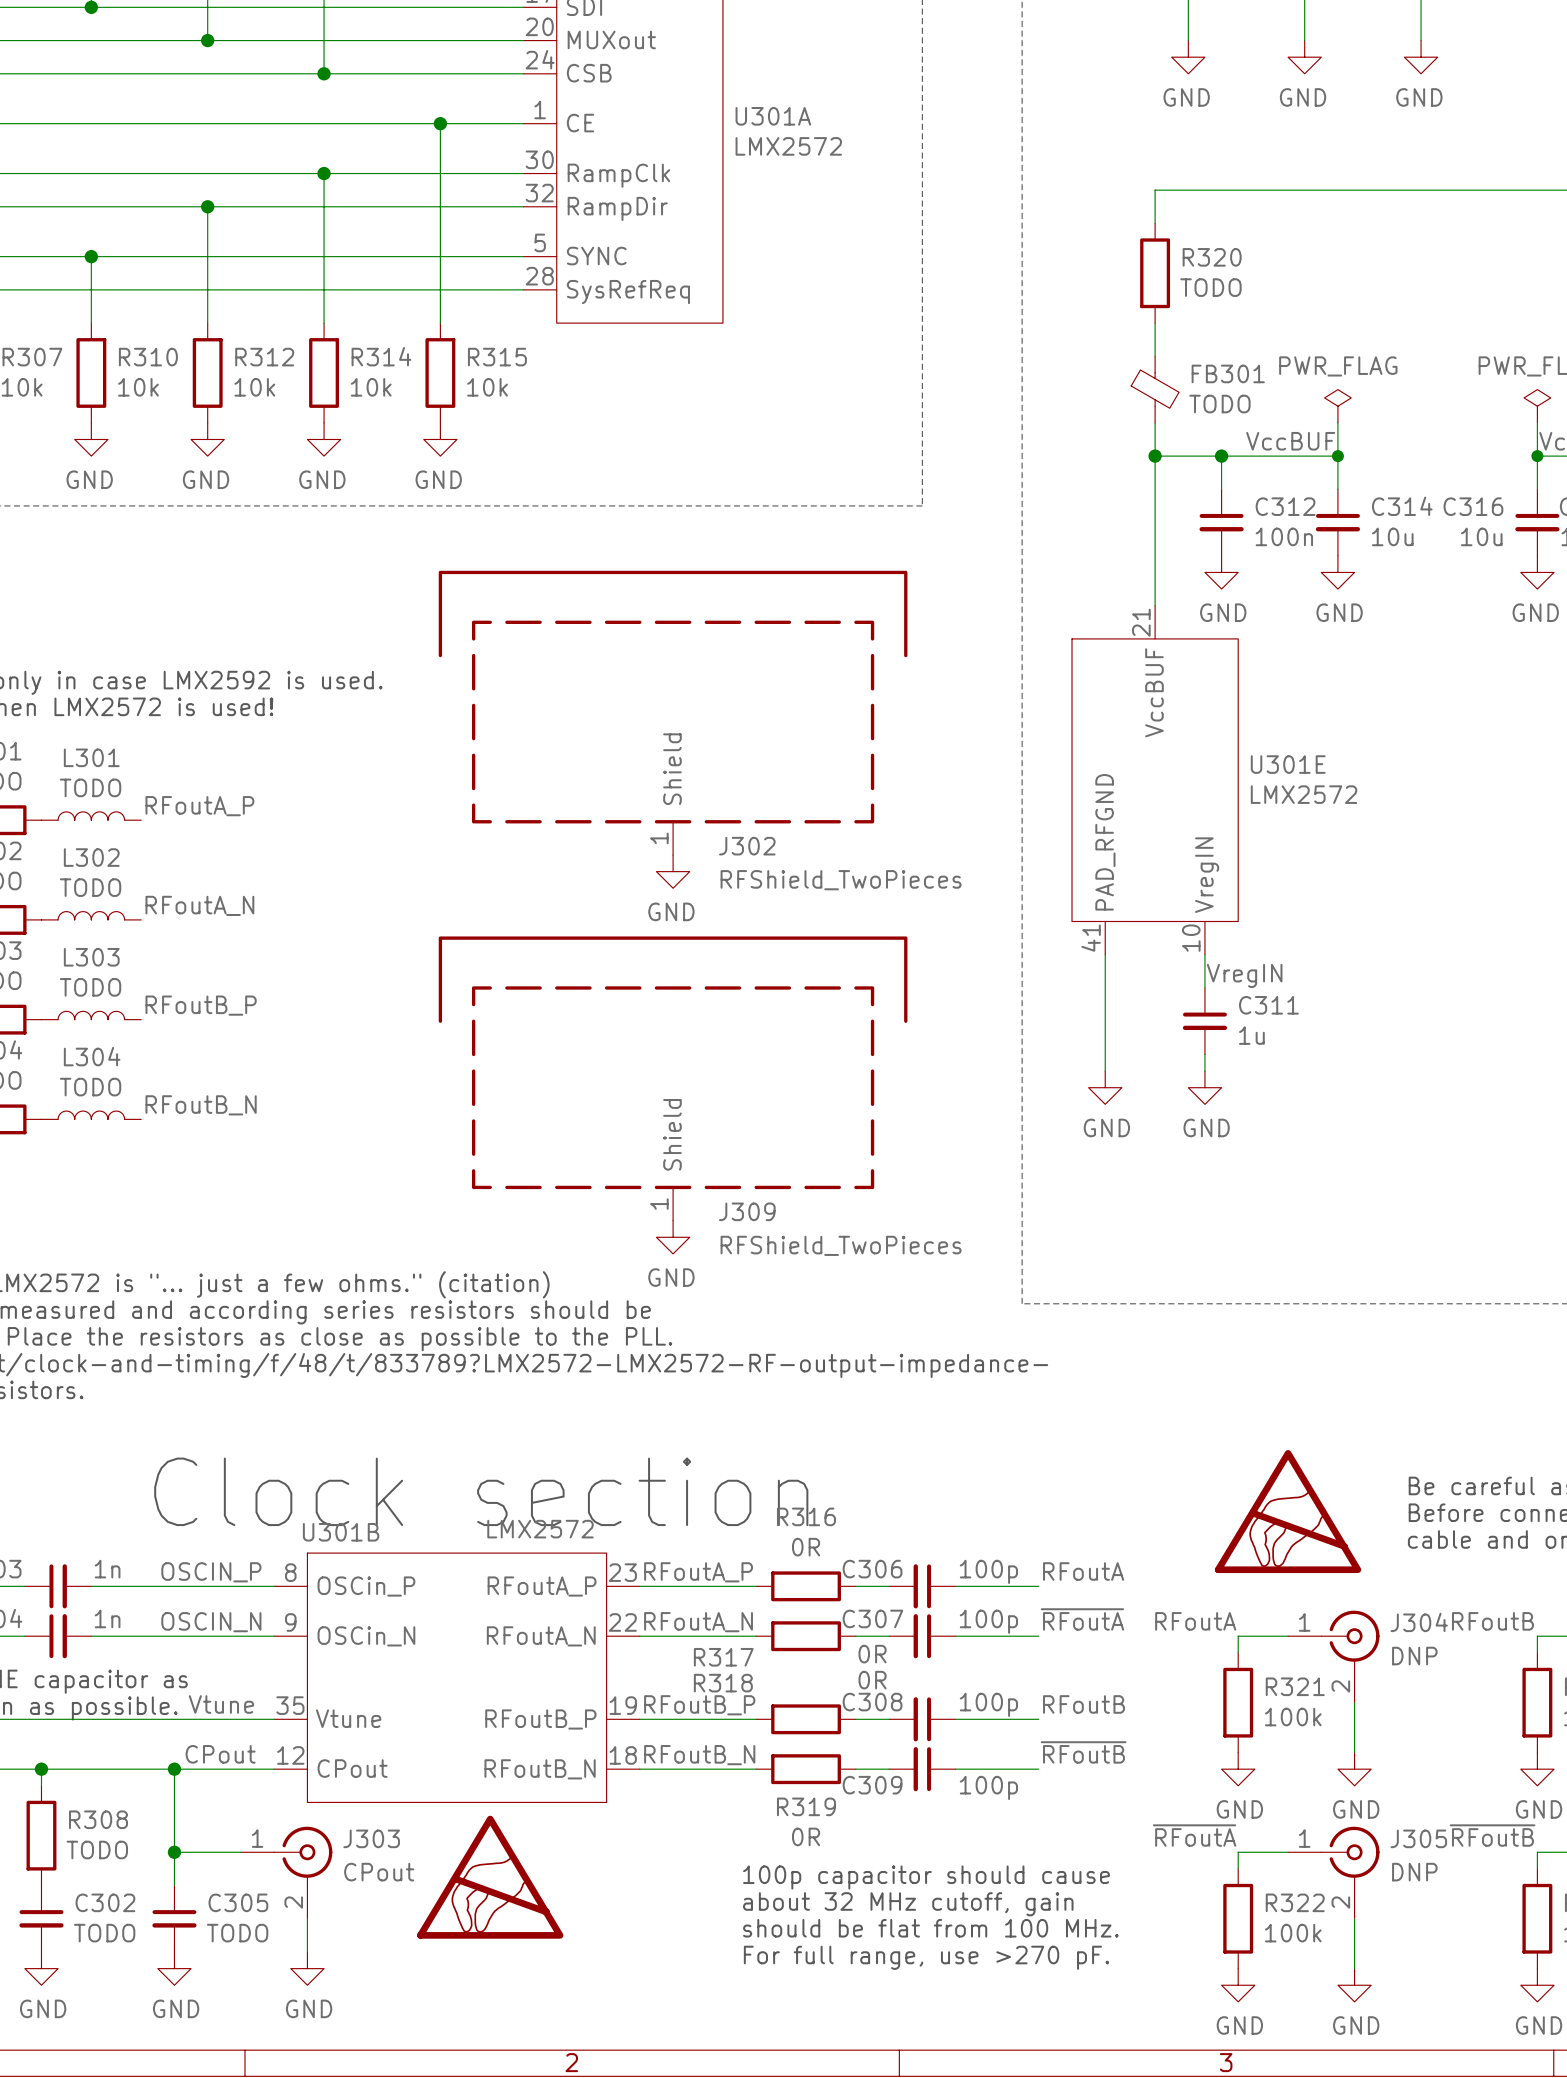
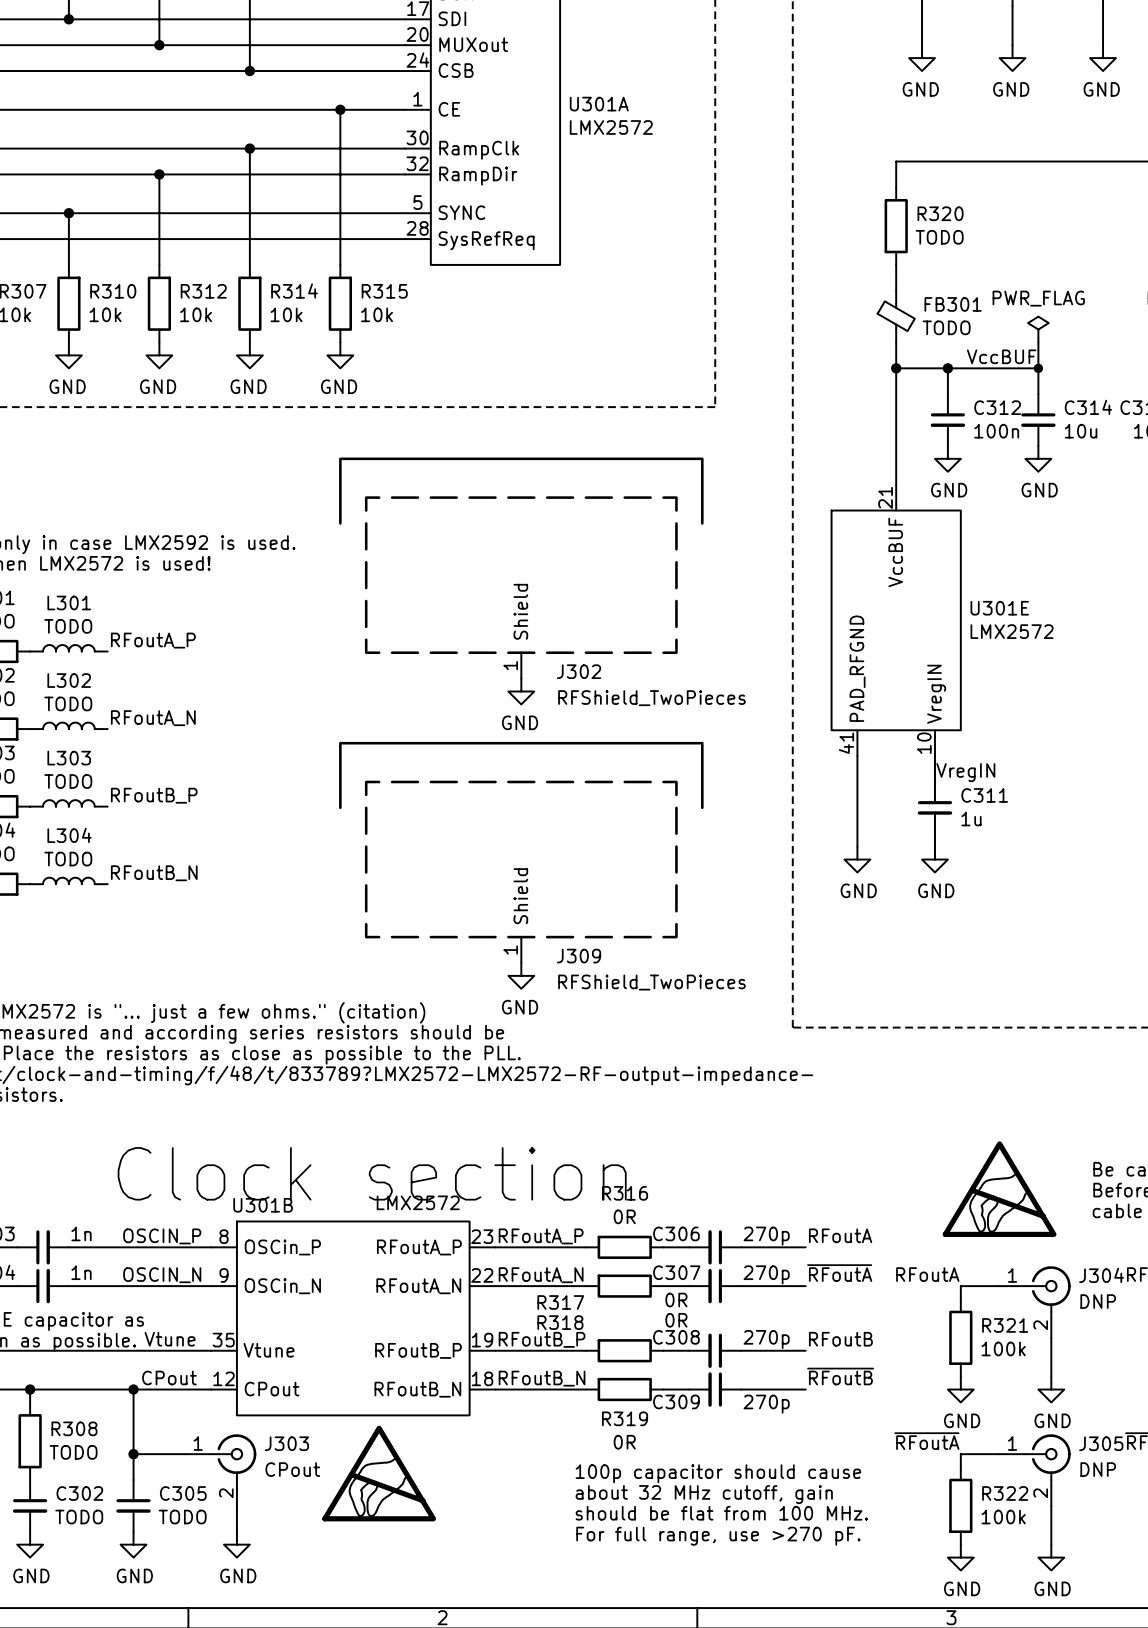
C306 value: 100p (988, 1571) -> 270p (766, 1236)
C307 value: 100p (988, 1621) -> 270p (766, 1274)
C308 value: 100p (988, 1704) -> 270p (766, 1339)
C309 value: 100p (988, 1787) -> 270p (766, 1404)

